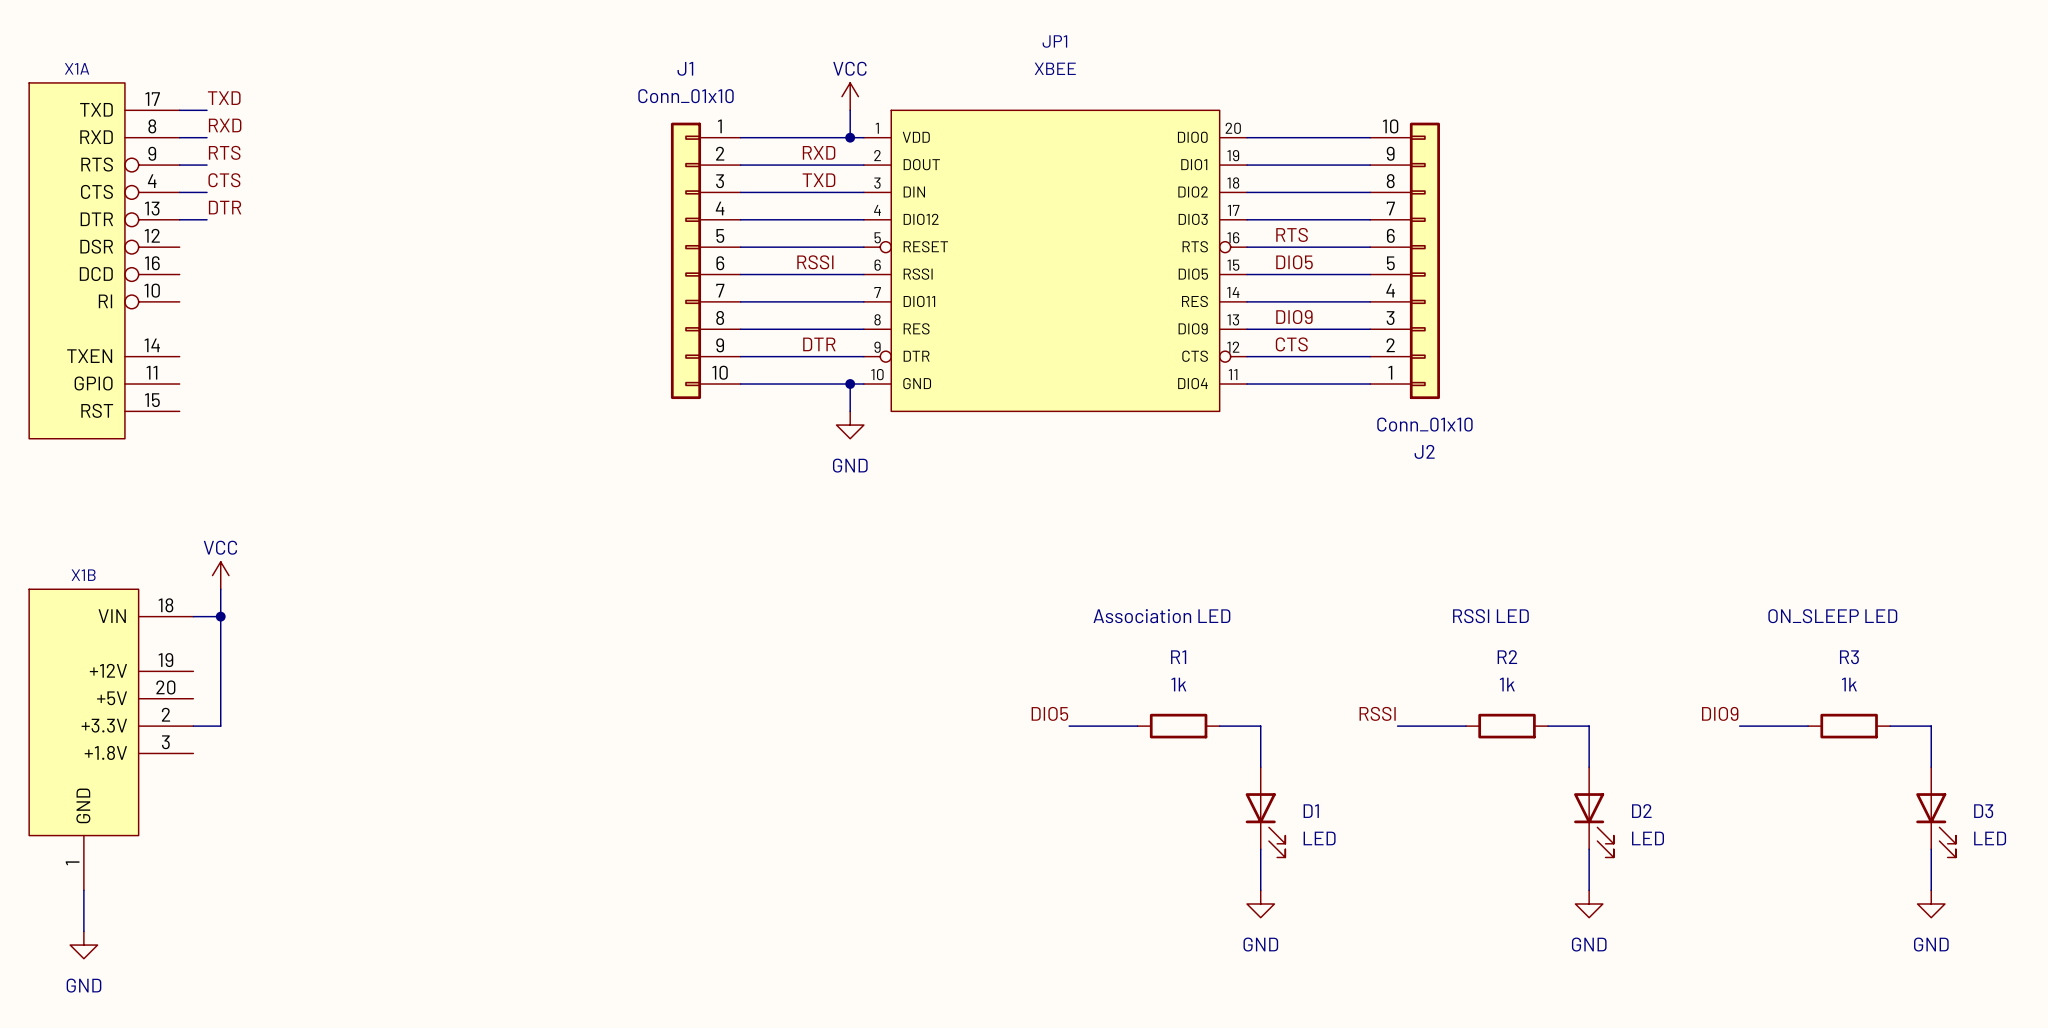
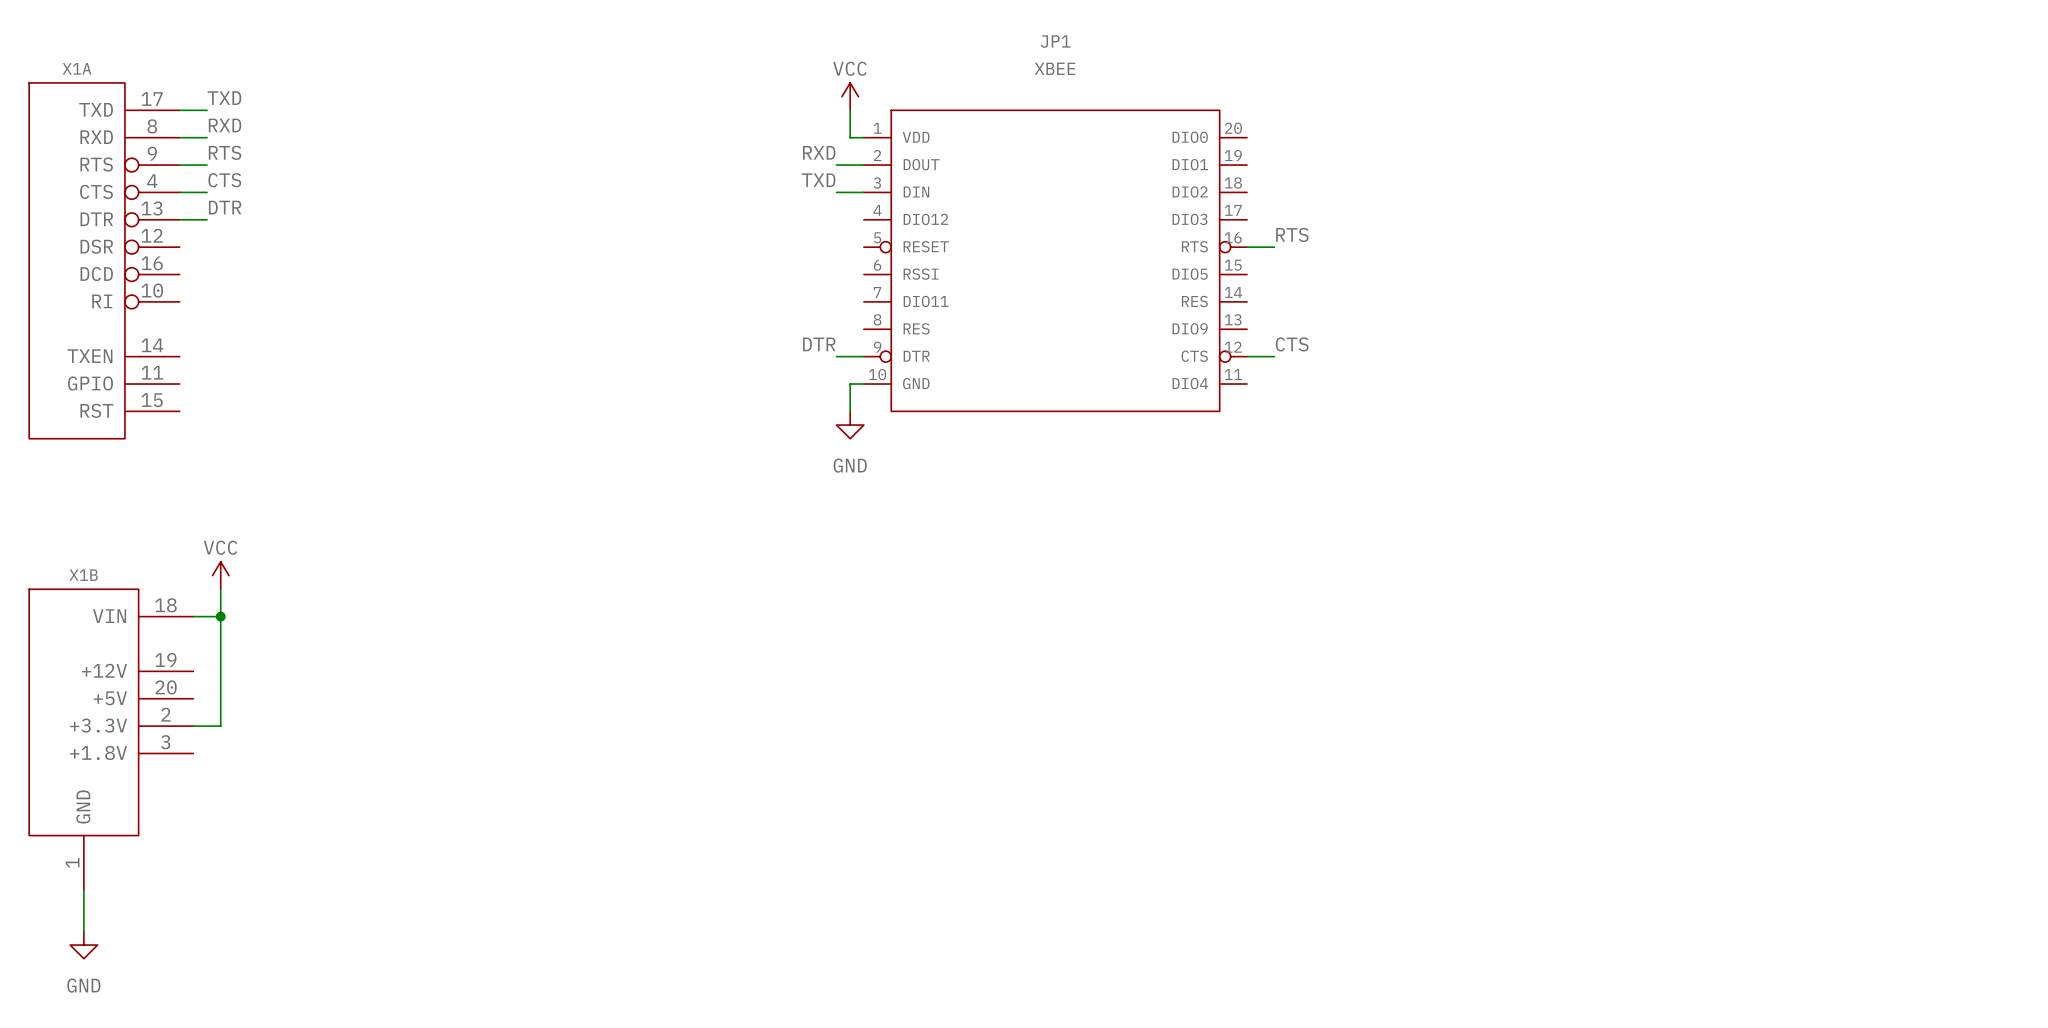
wire: (740, 137) (850, 137) -> none
junction: (850, 137) -> none
wire: (1247, 137) (1370, 137) -> none
wire: (740, 165) (836, 165) -> none
wire: (1247, 165) (1370, 165) -> none
wire: (740, 192) (836, 192) -> none
wire: (1247, 192) (1370, 192) -> none
wire: (740, 219) (863, 219) -> none
wire: (1247, 219) (1370, 219) -> none
wire: (740, 247) (863, 247) -> none
wire: (1274, 247) (1370, 247) -> none
J1: Conn_01x10 (705, 260) -> none
J2: Conn_01x10 (1405, 260) -> none
label: RSSI (815, 262) -> none
label: DIO5 (1294, 262) -> none
wire: (740, 274) (863, 274) -> none
wire: (1247, 274) (1370, 274) -> none
wire: (740, 301) (863, 301) -> none
wire: (1247, 301) (1370, 301) -> none
label: DIO9 (1294, 317) -> none
wire: (740, 329) (863, 329) -> none
wire: (1247, 329) (1370, 329) -> none
wire: (740, 356) (836, 356) -> none
wire: (1274, 356) (1370, 356) -> none
wire: (740, 384) (850, 384) -> none
junction: (850, 384) -> none
wire: (1247, 384) (1370, 384) -> none
text: Association LED (1161, 616) -> none
text: RSSI LED (1490, 616) -> none
text: ON_SLEEP LED (1832, 616) -> none
label: DIO5 (1049, 713) -> none
label: RSSI (1377, 713) -> none
label: DIO9 (1720, 713) -> none
wire: (1069, 726) (1137, 726) -> none
R1: 1k (1178, 726) -> none
wire: (1219, 726) (1260, 726) (1260, 767) -> none
wire: (1397, 726) (1465, 726) -> none
R2: 1k (1507, 726) -> none
wire: (1548, 726) (1589, 726) (1589, 767) -> none
wire: (1739, 726) (1808, 726) -> none
R3: 1k (1849, 726) -> none
wire: (1890, 726) (1931, 726) (1931, 767) -> none
D1: LED (1265, 812) -> none
D2: LED (1593, 812) -> none
D3: LED (1936, 812) -> none
wire: (1260, 849) (1260, 890) -> none
wire: (1589, 849) (1589, 890) -> none
wire: (1931, 849) (1931, 890) -> none
power symbol: GND (1260, 904) -> none
power symbol: GND (1589, 904) -> none
power symbol: GND (1931, 904) -> none

